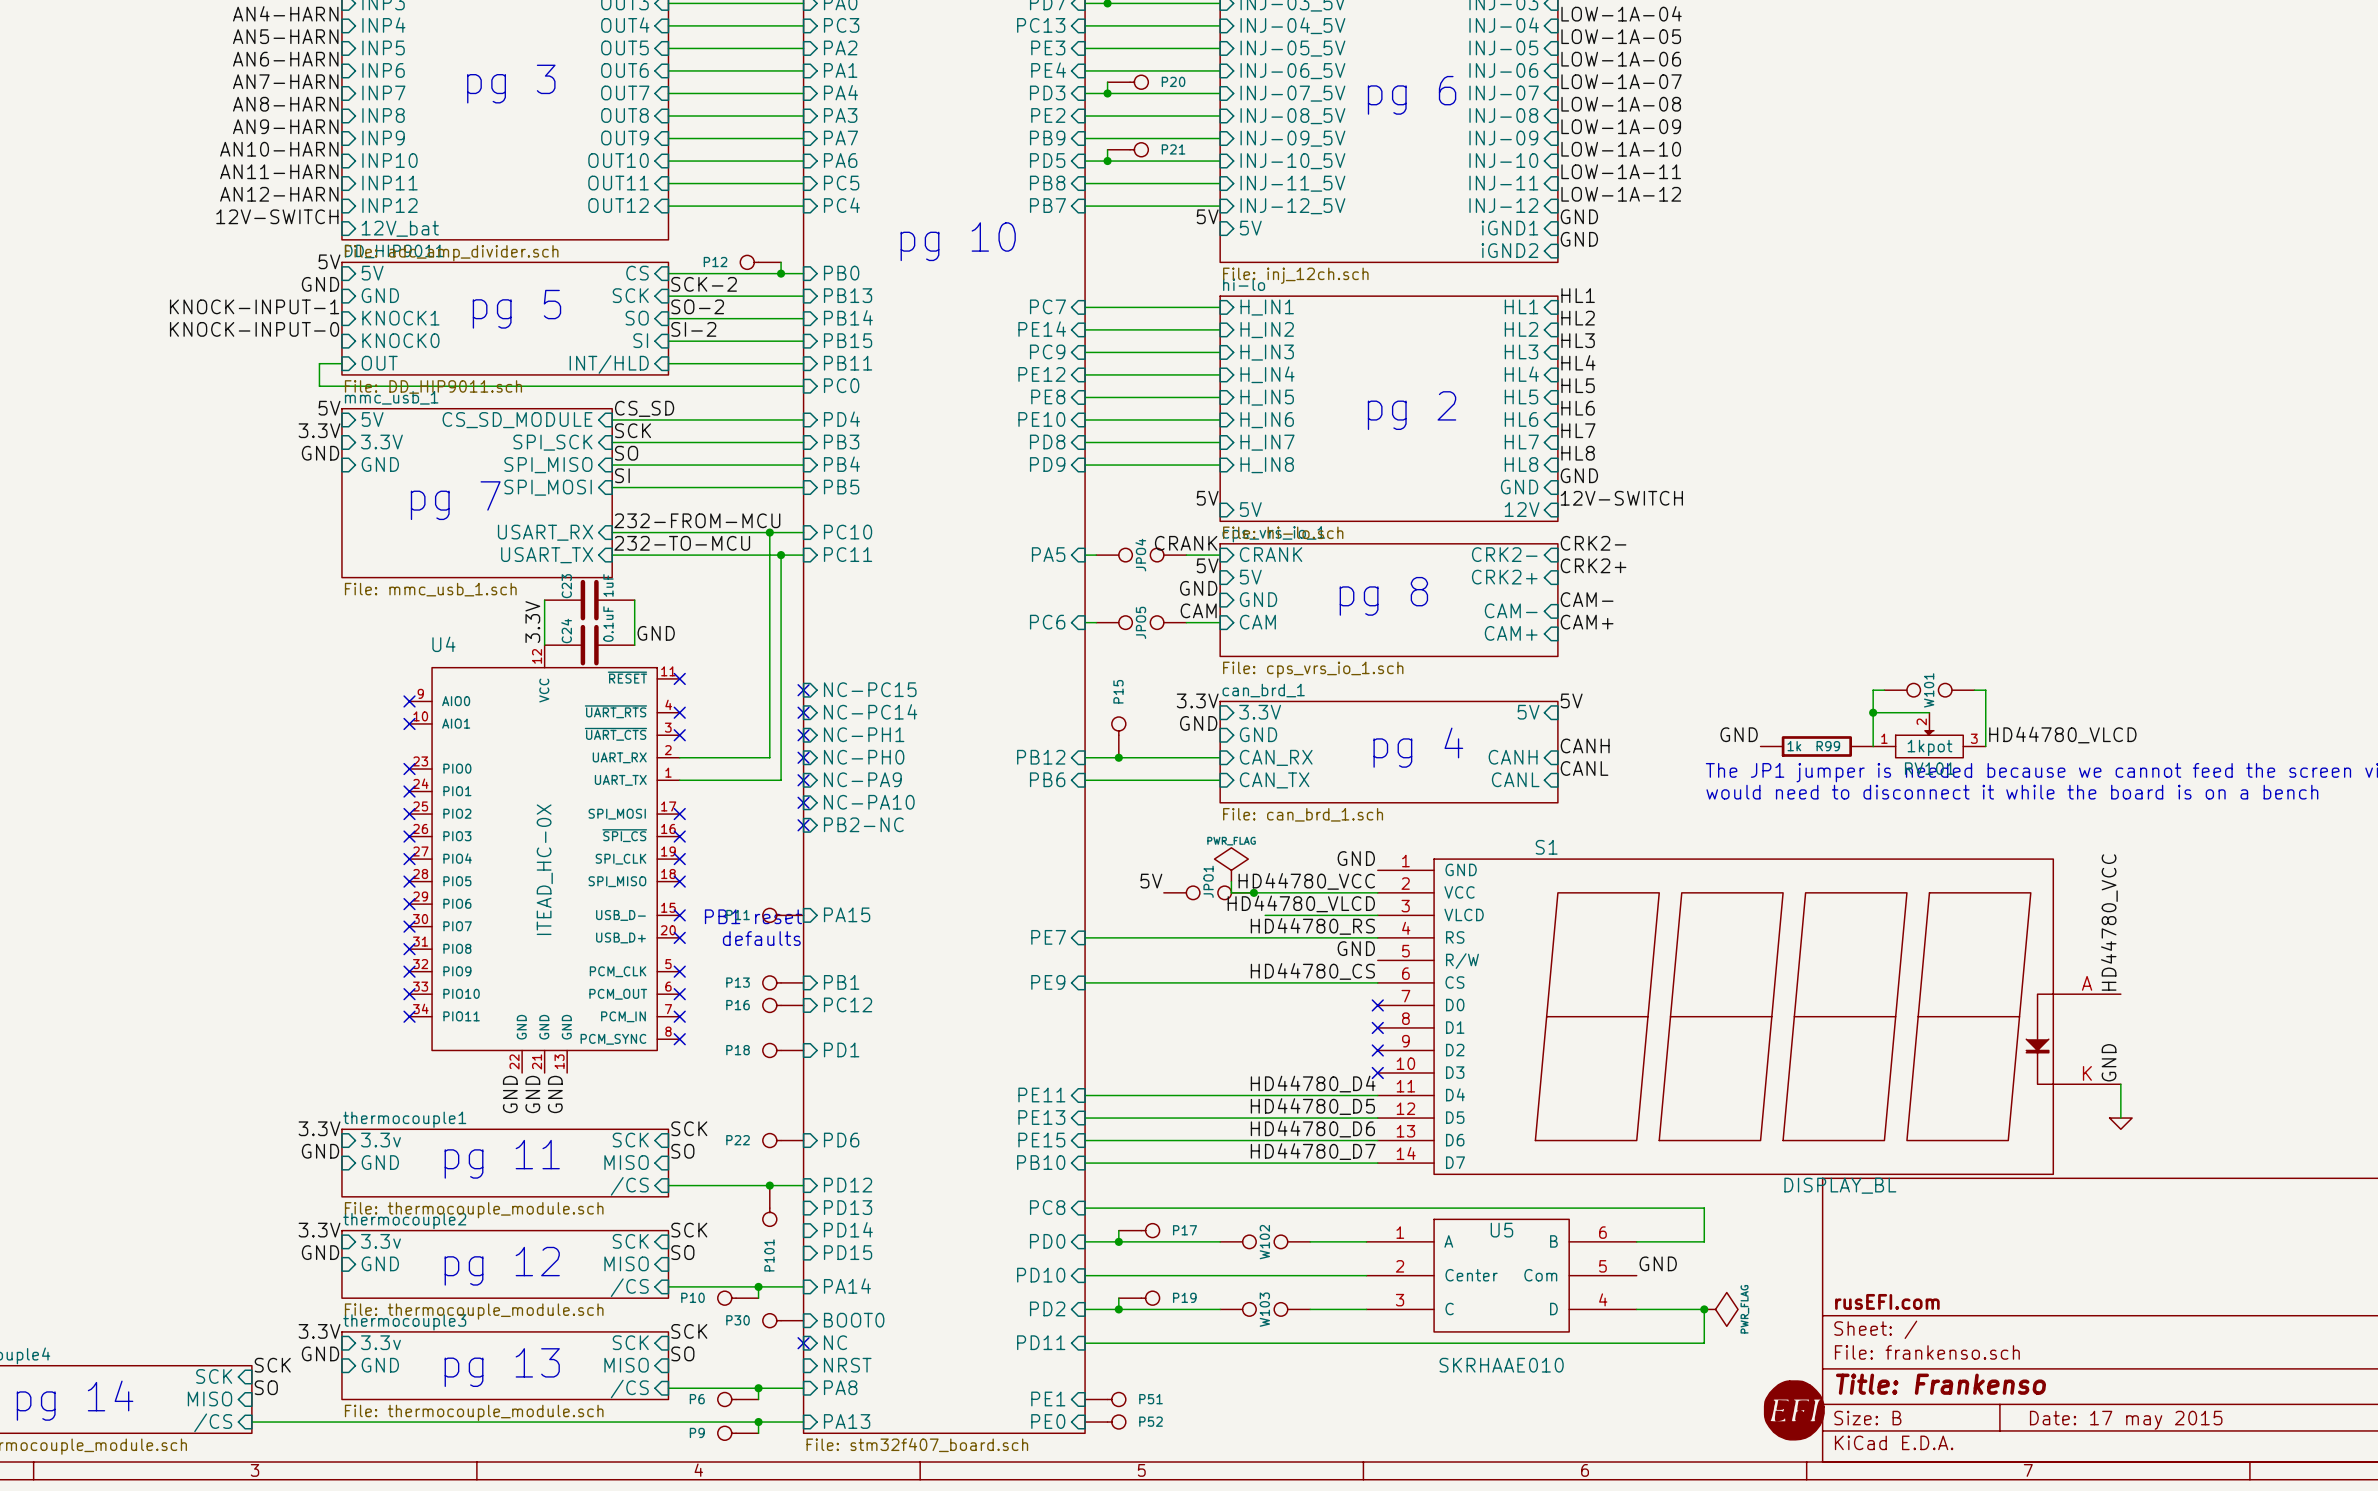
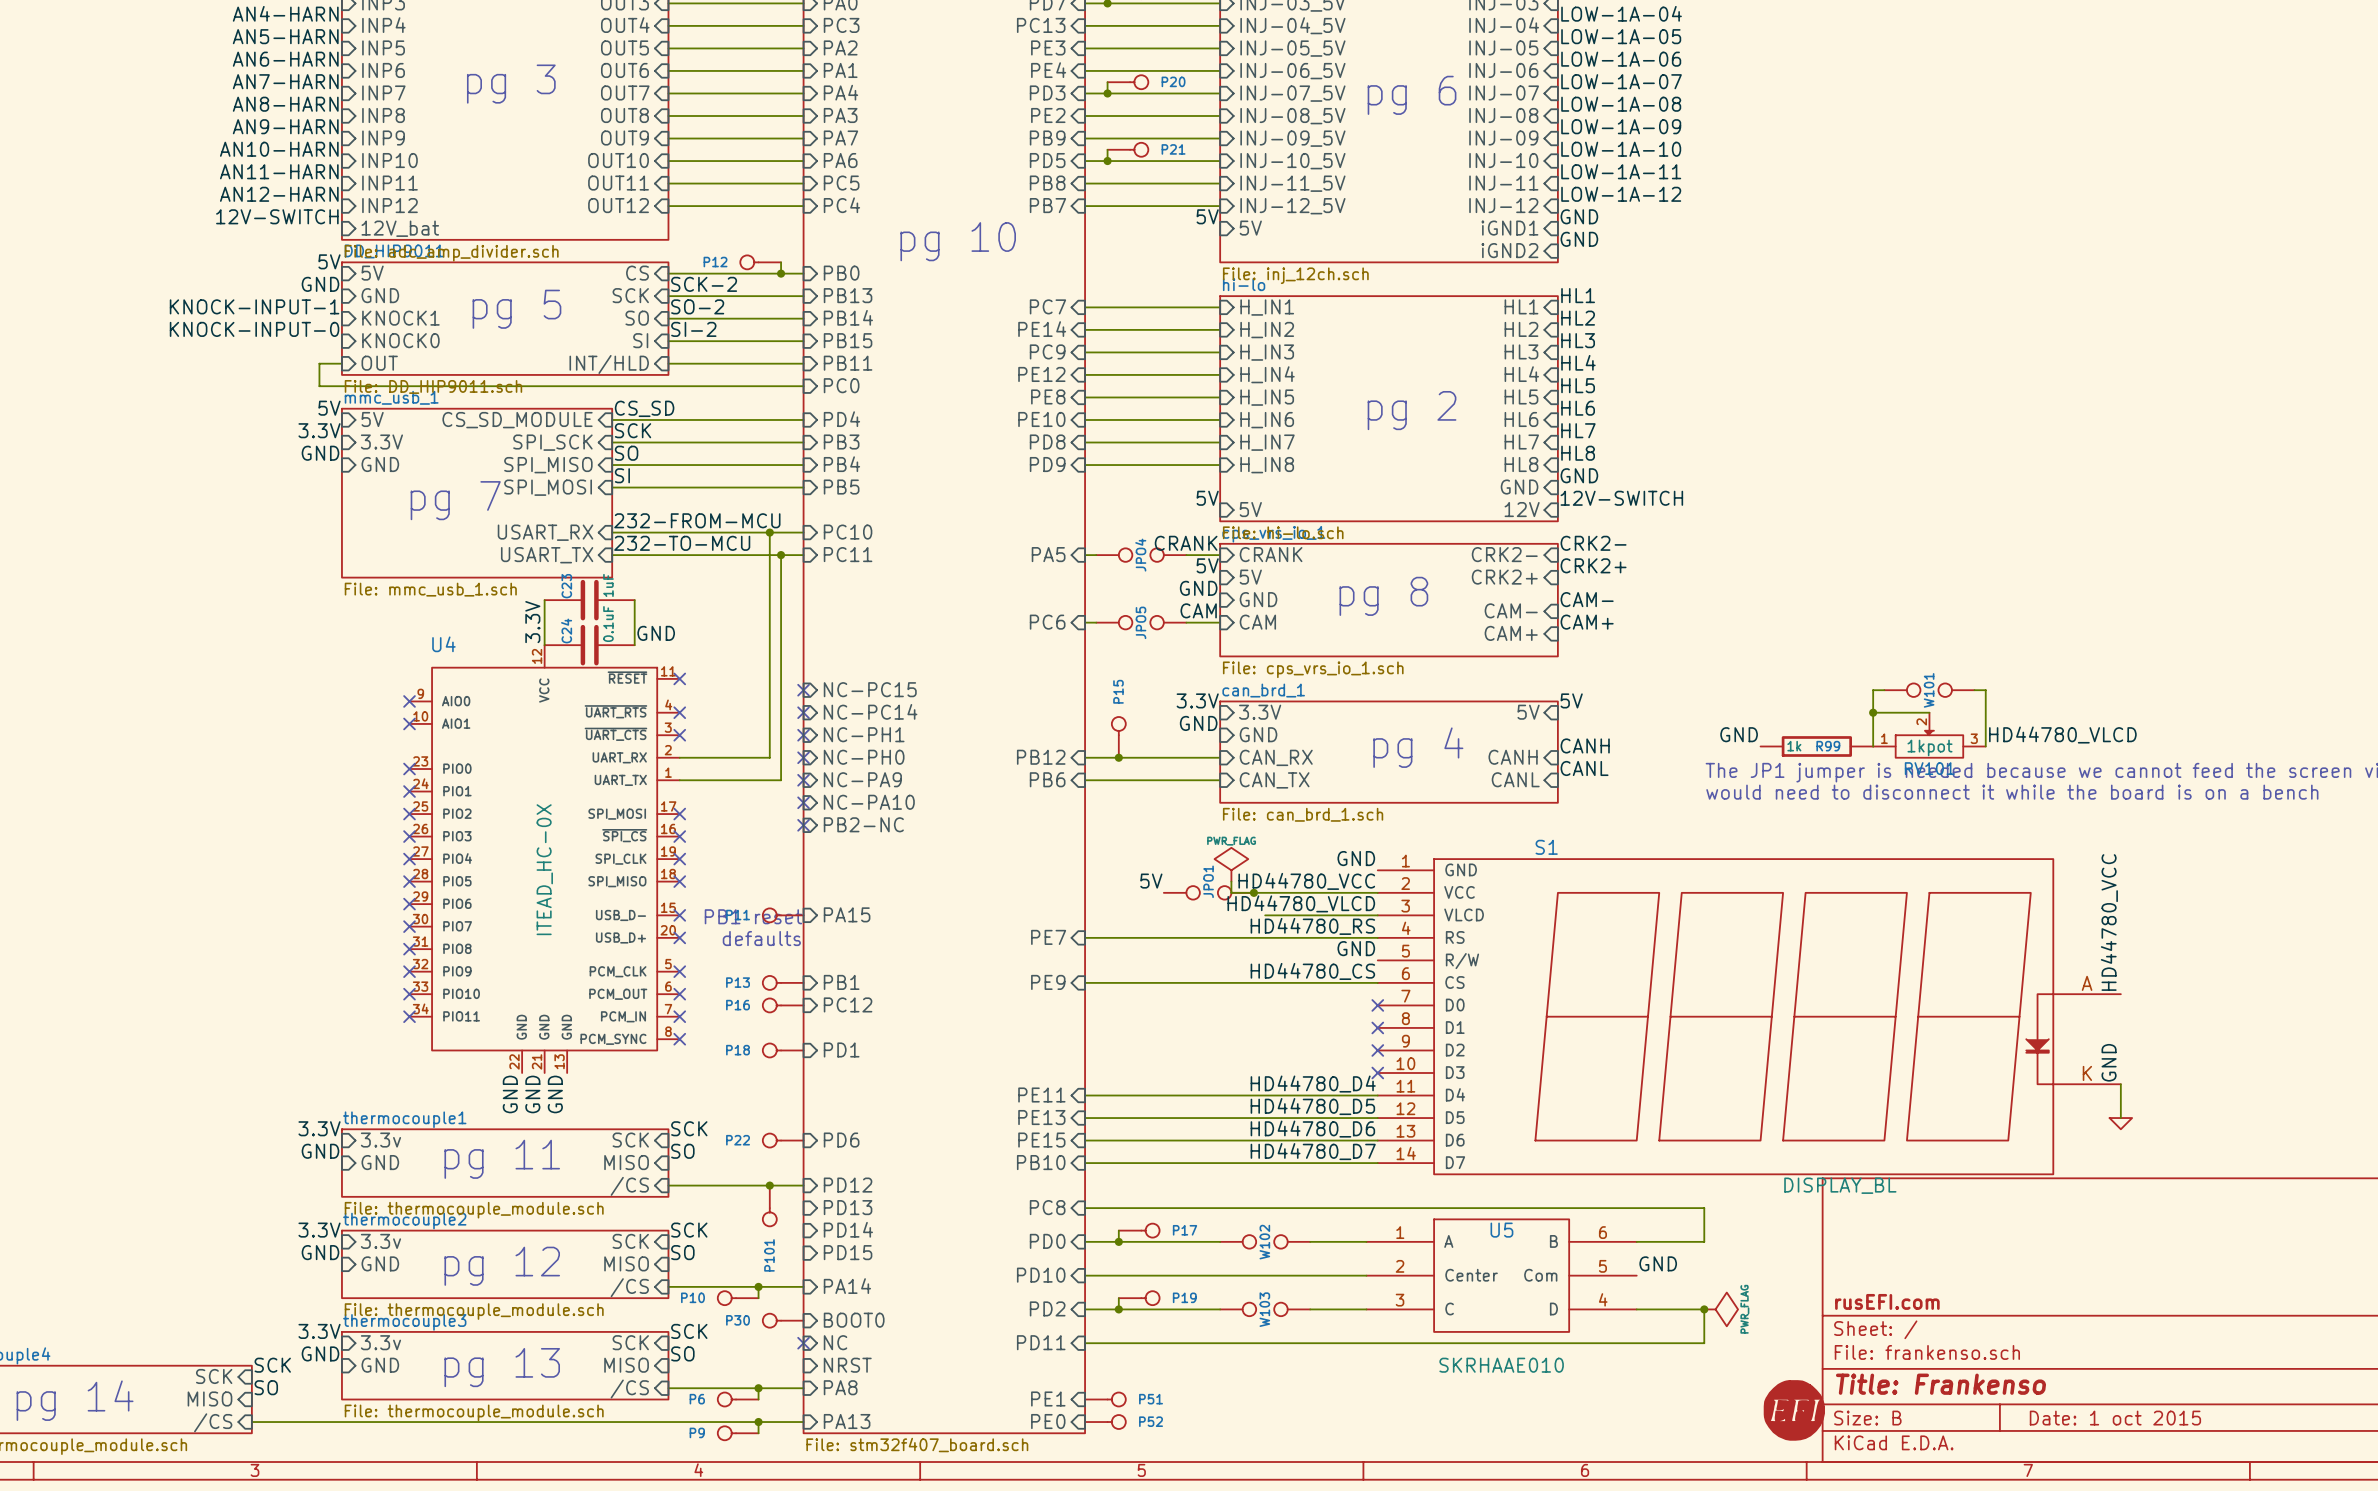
title block: Date: 17 may 2015 (2126, 1420) -> Date: 1 oct 2015 (2115, 1418)

